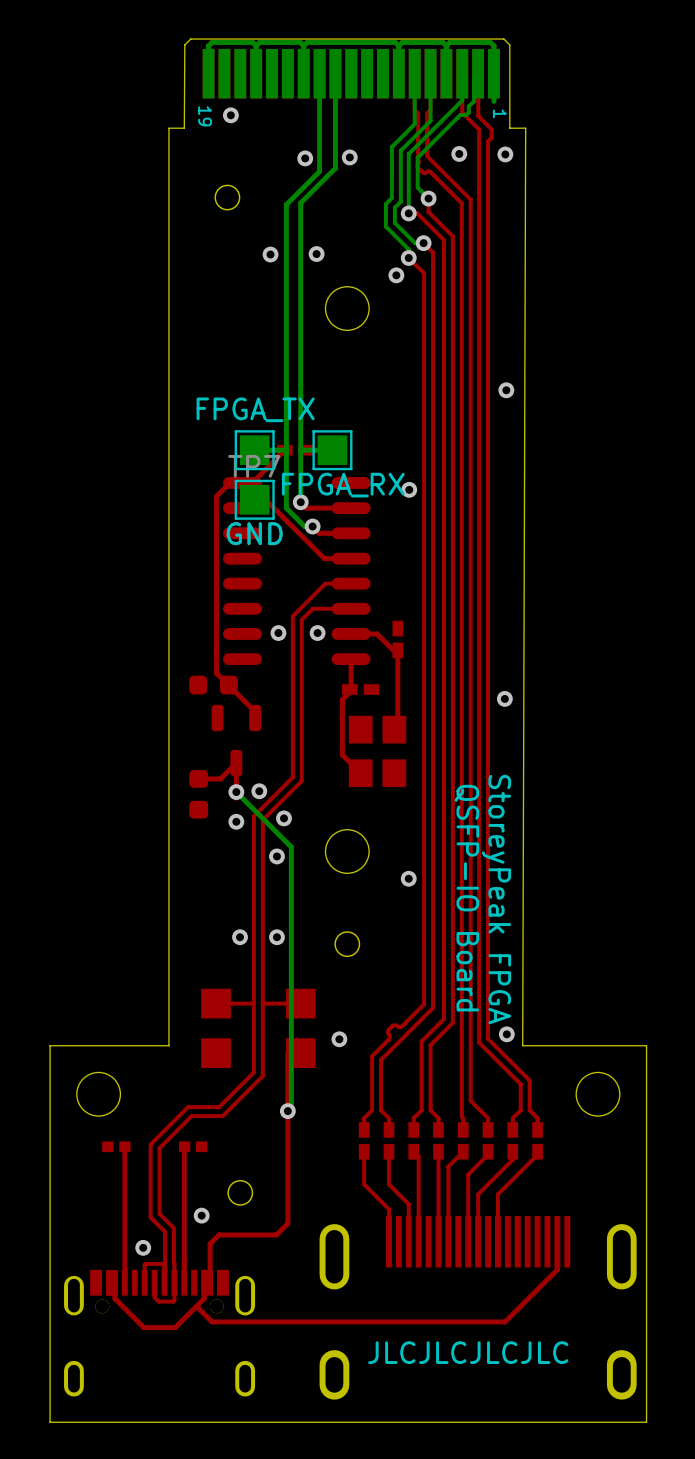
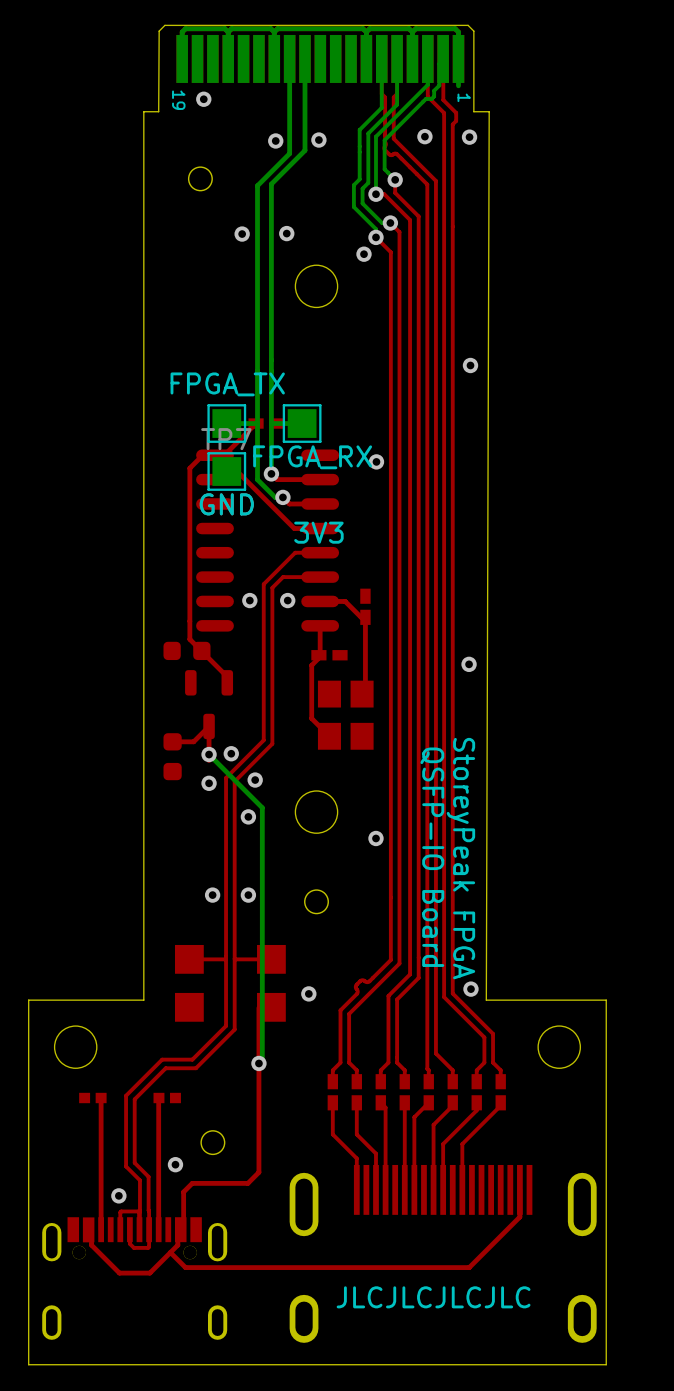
text: none -> 3V3 (318, 532)

